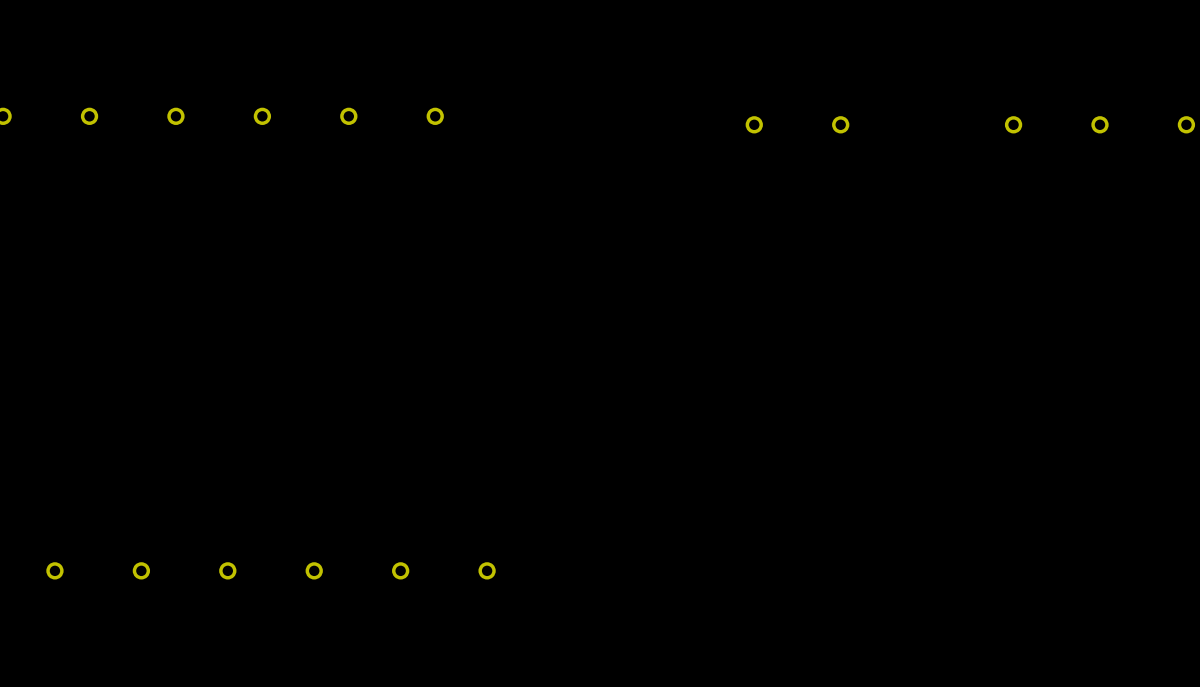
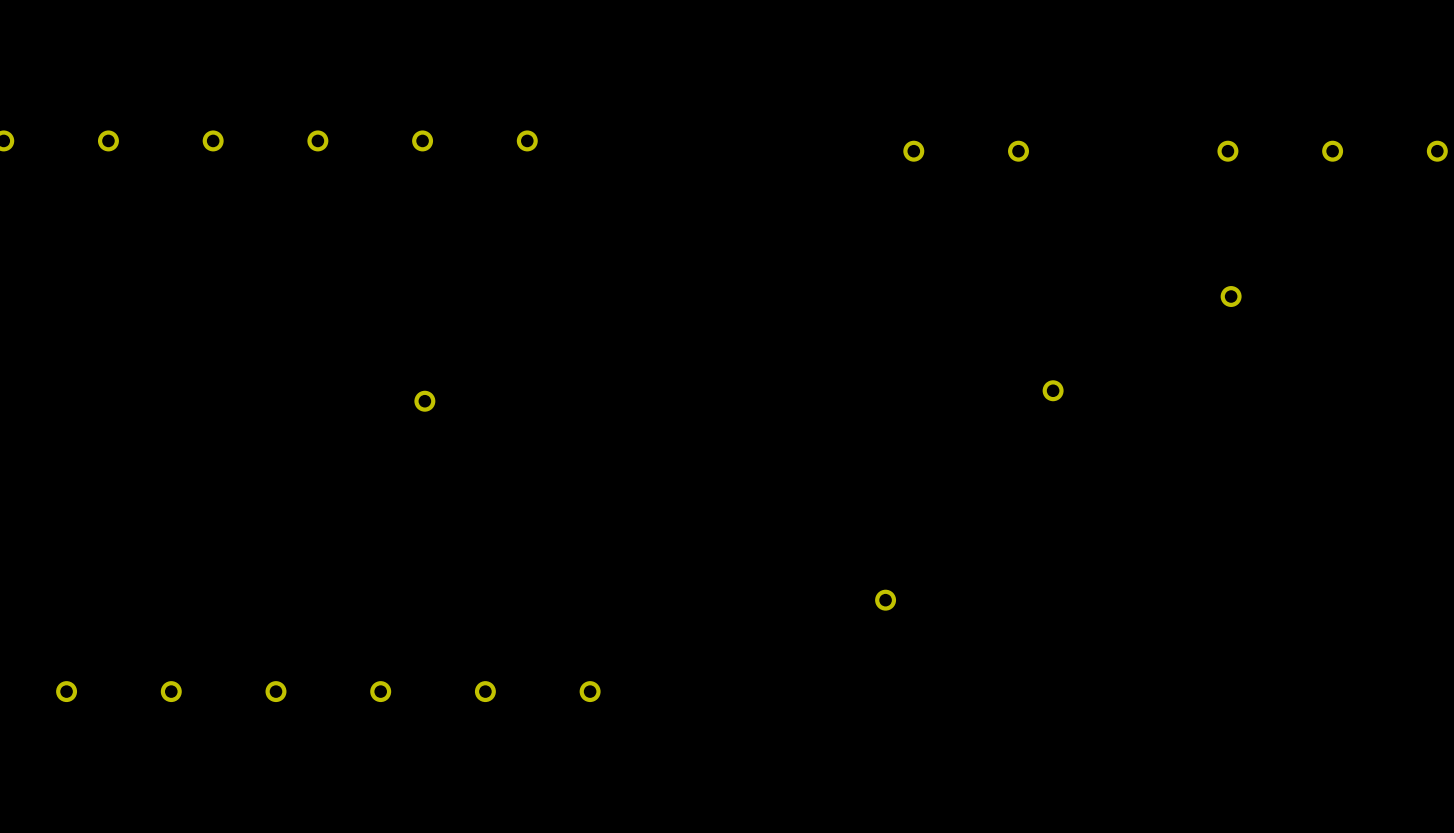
part: none -> (1231, 296)
part: none -> (1053, 390)
part: none -> (424, 401)
part: none -> (885, 600)

